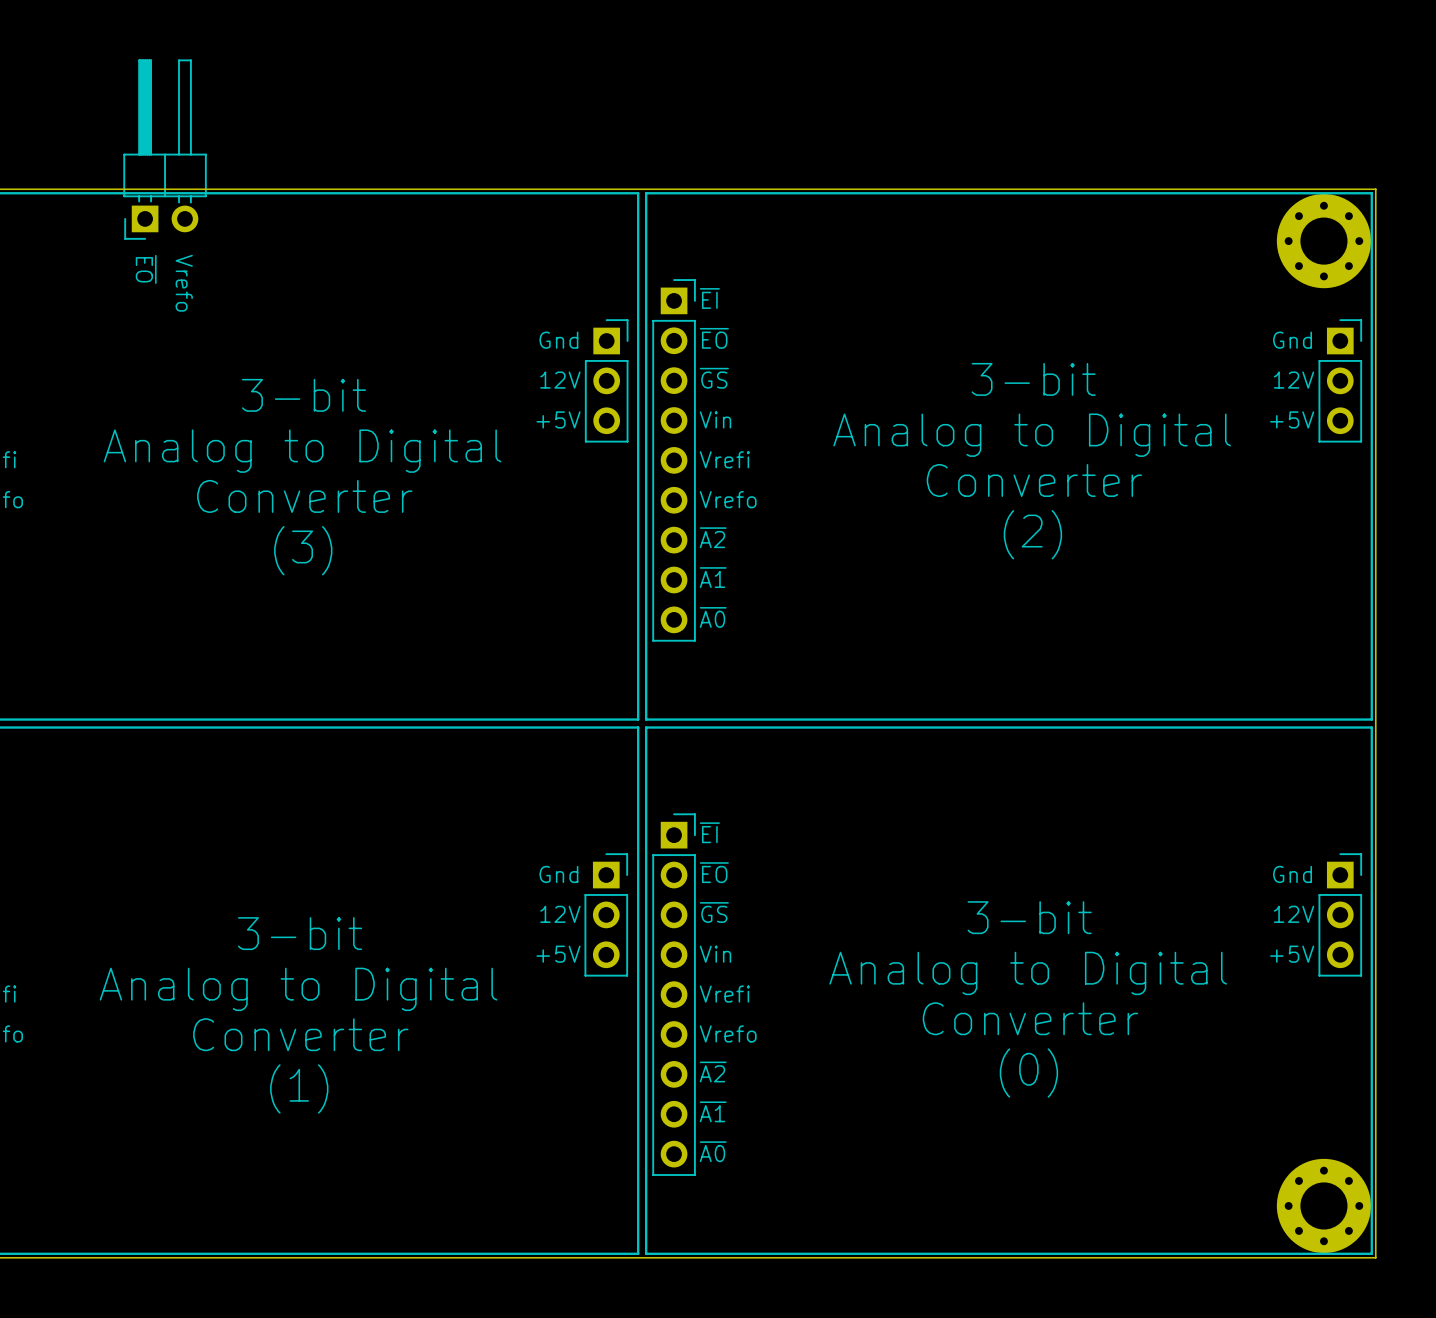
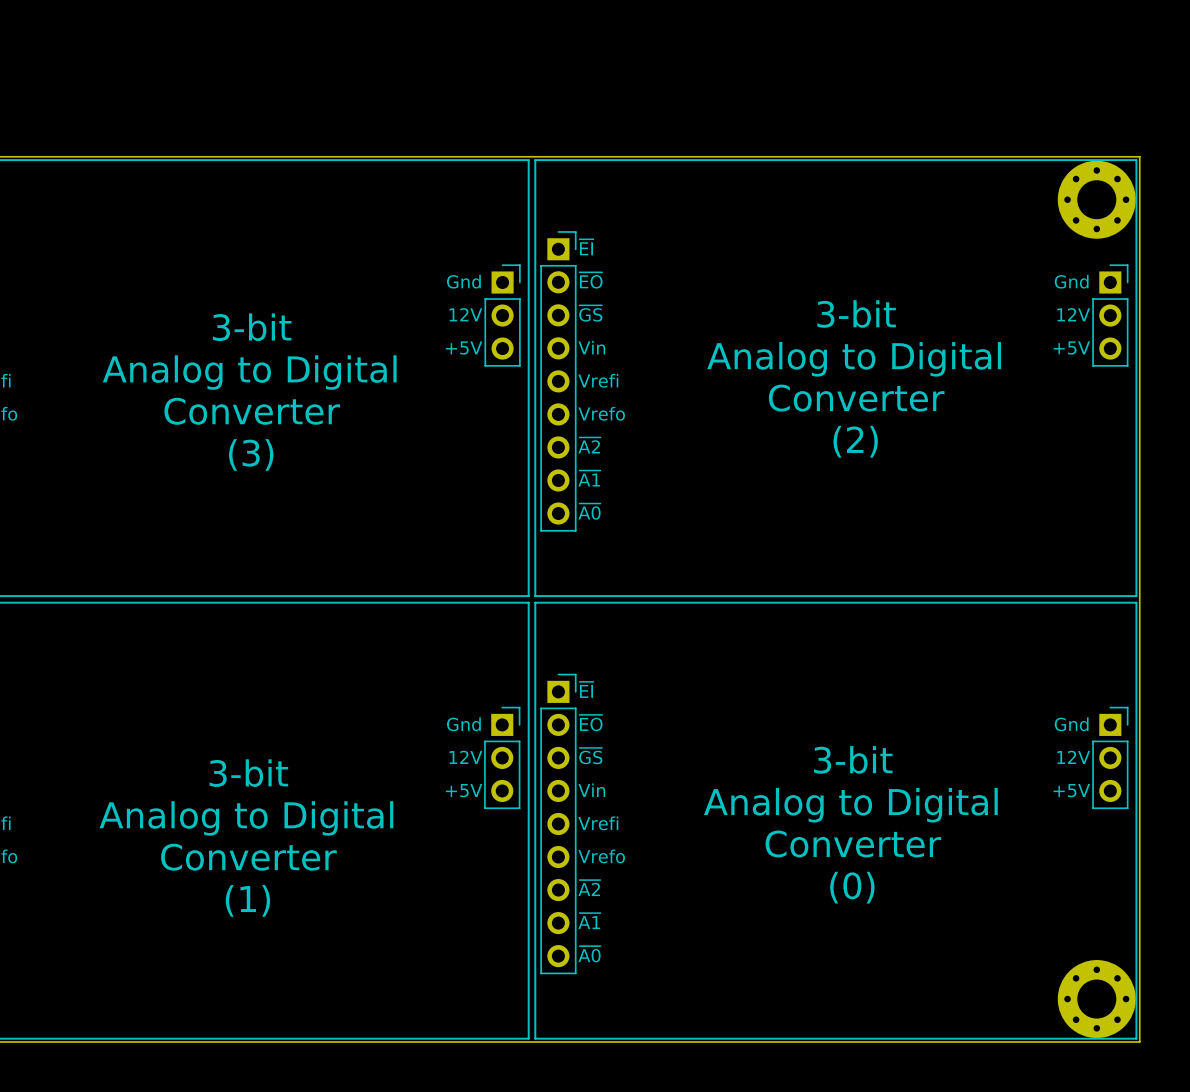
part: (165, 149) -> none
text: ~{EO} (146, 269) -> none
text: Vrefo (184, 283) -> none

